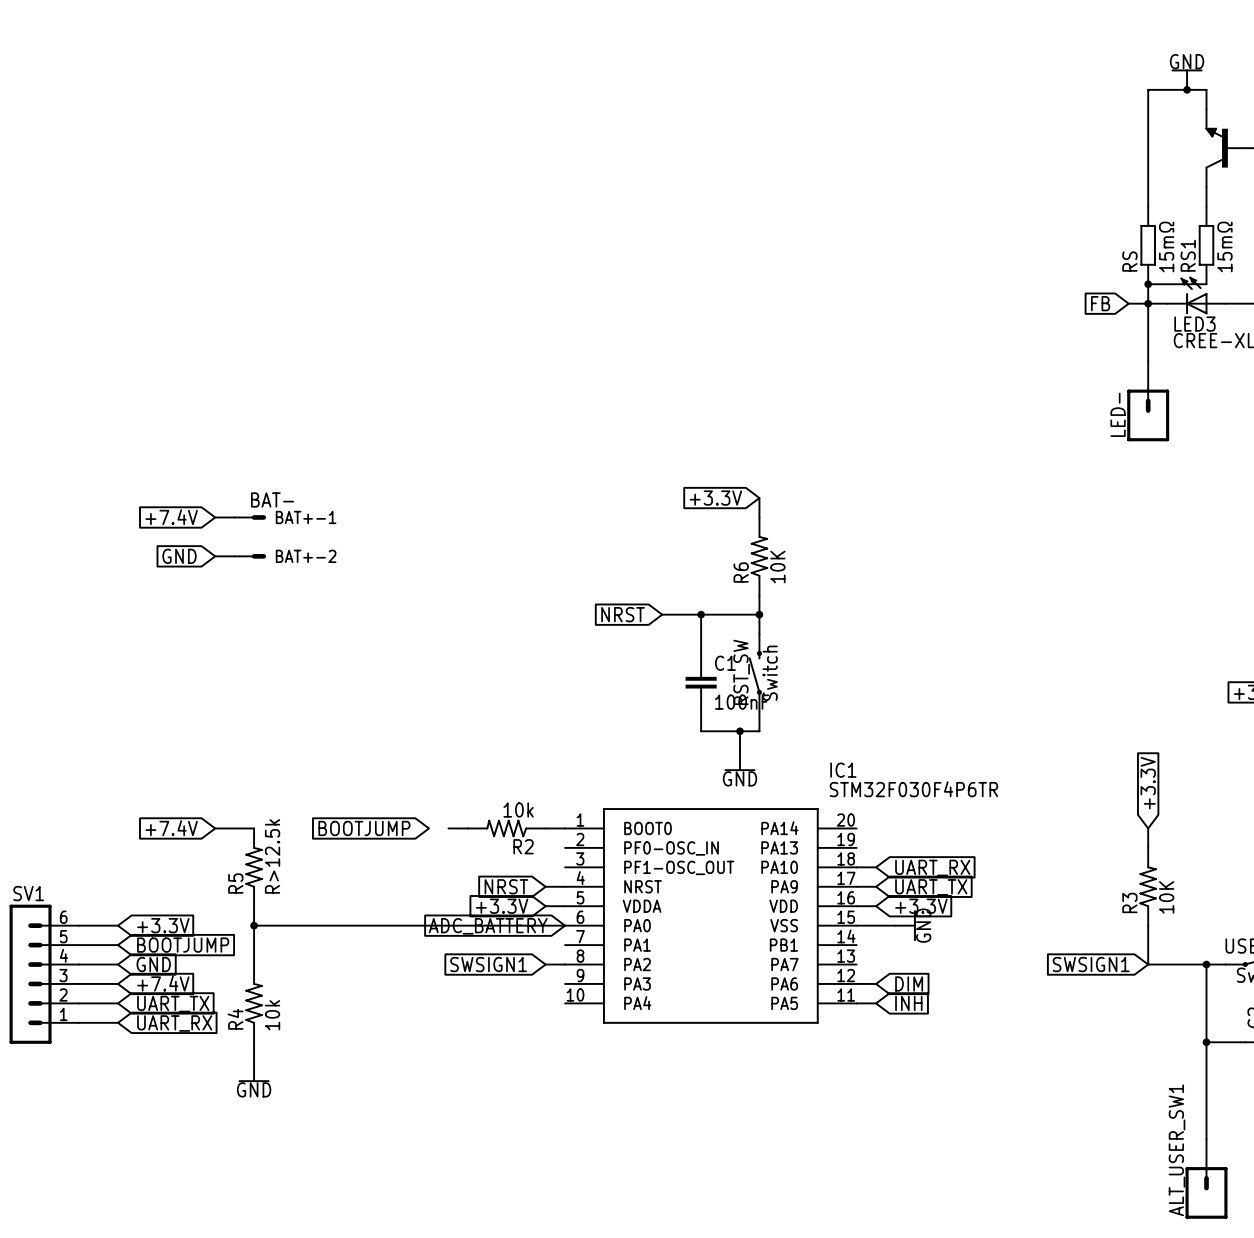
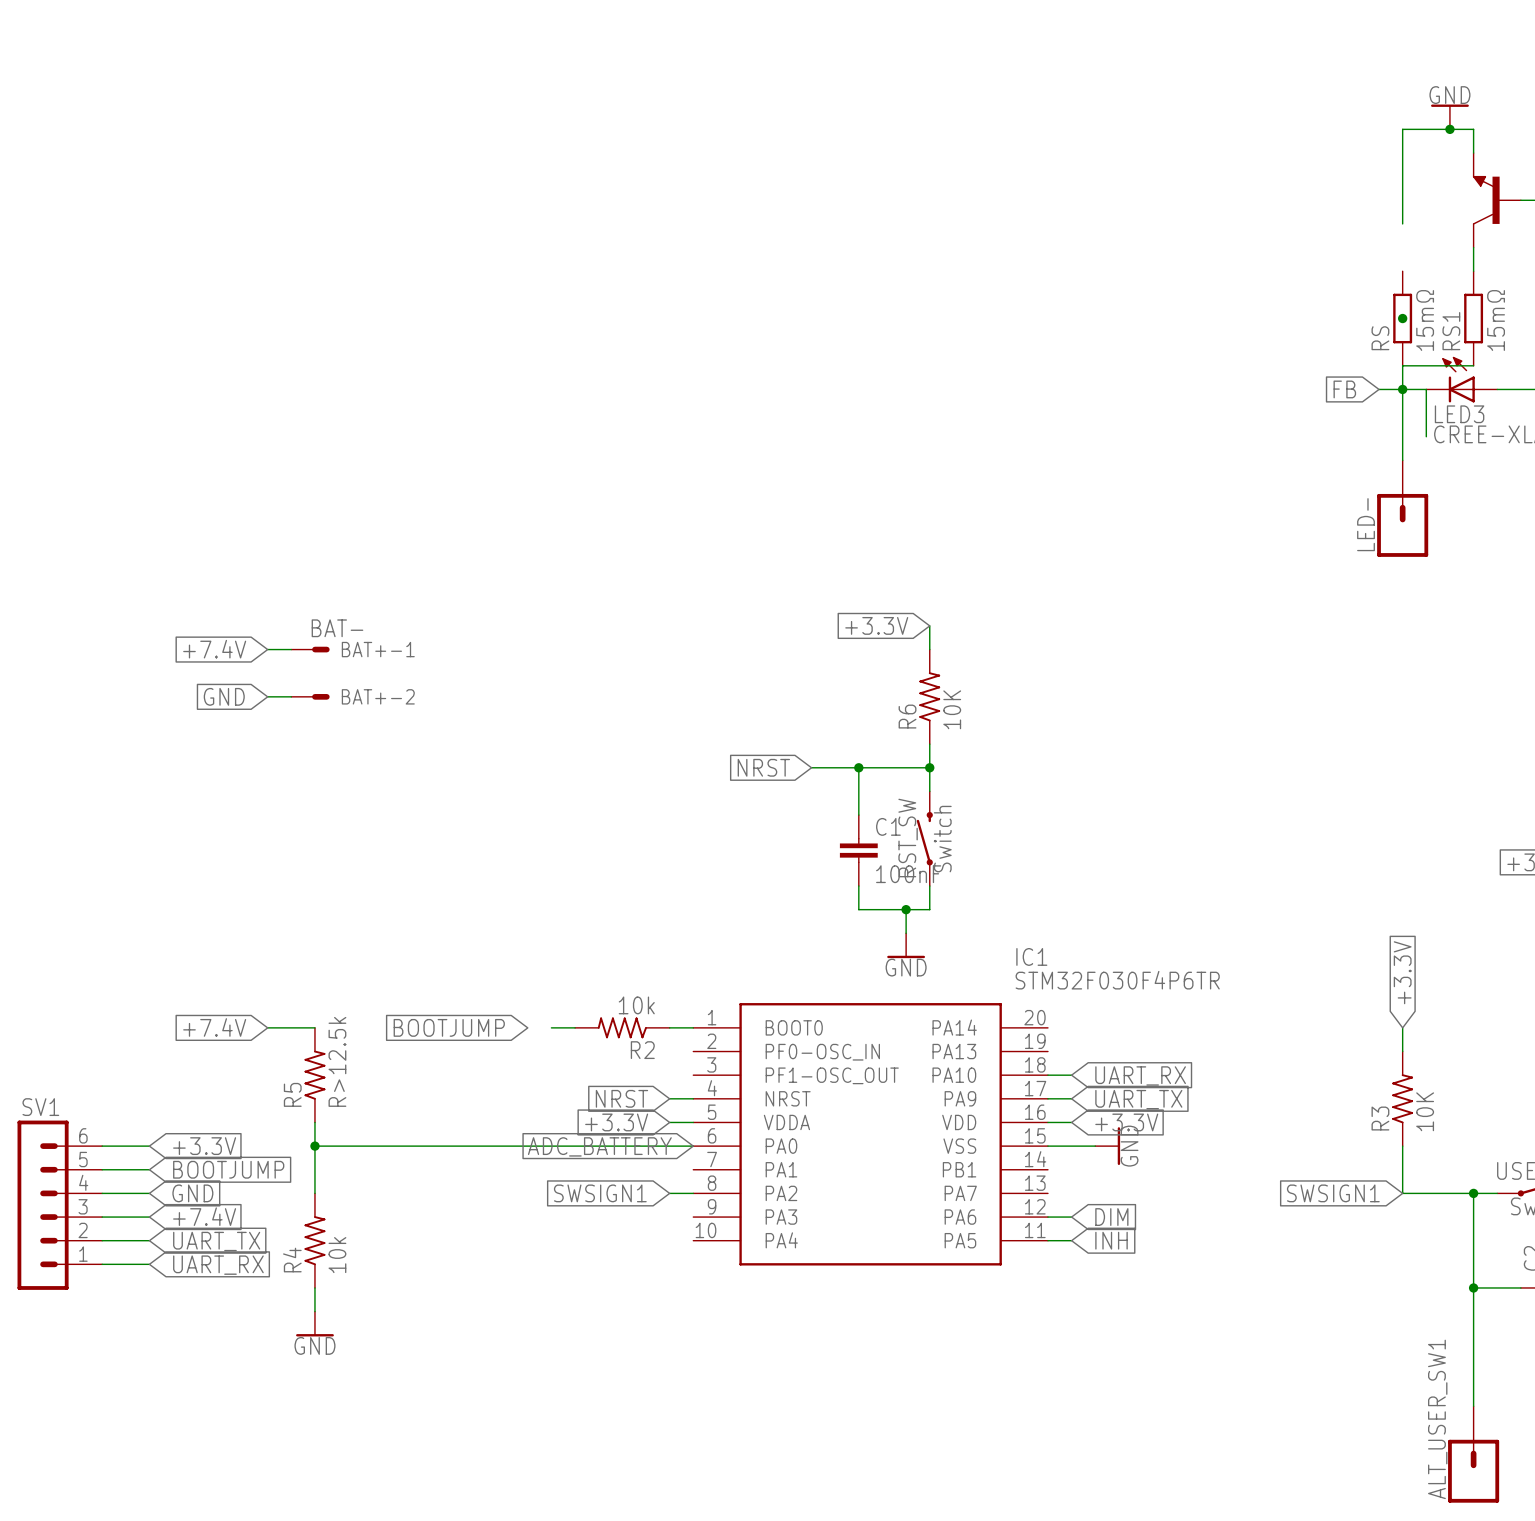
wire: (1148, 167) (1148, 206) -> (1426, 389) (1426, 436)
junction position: (1148, 284) -> (1402, 318)

